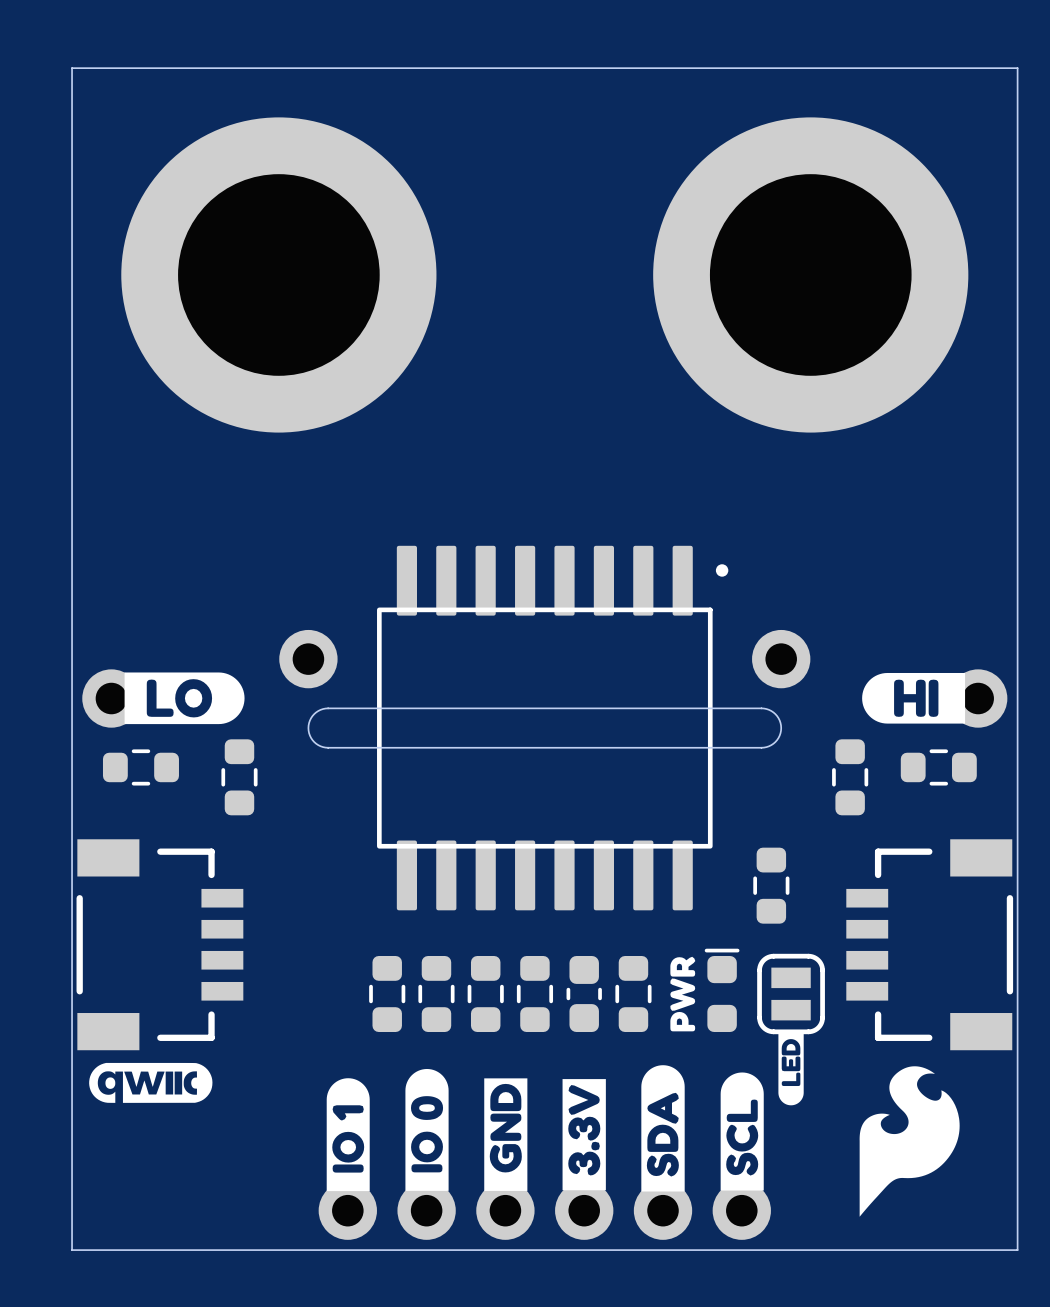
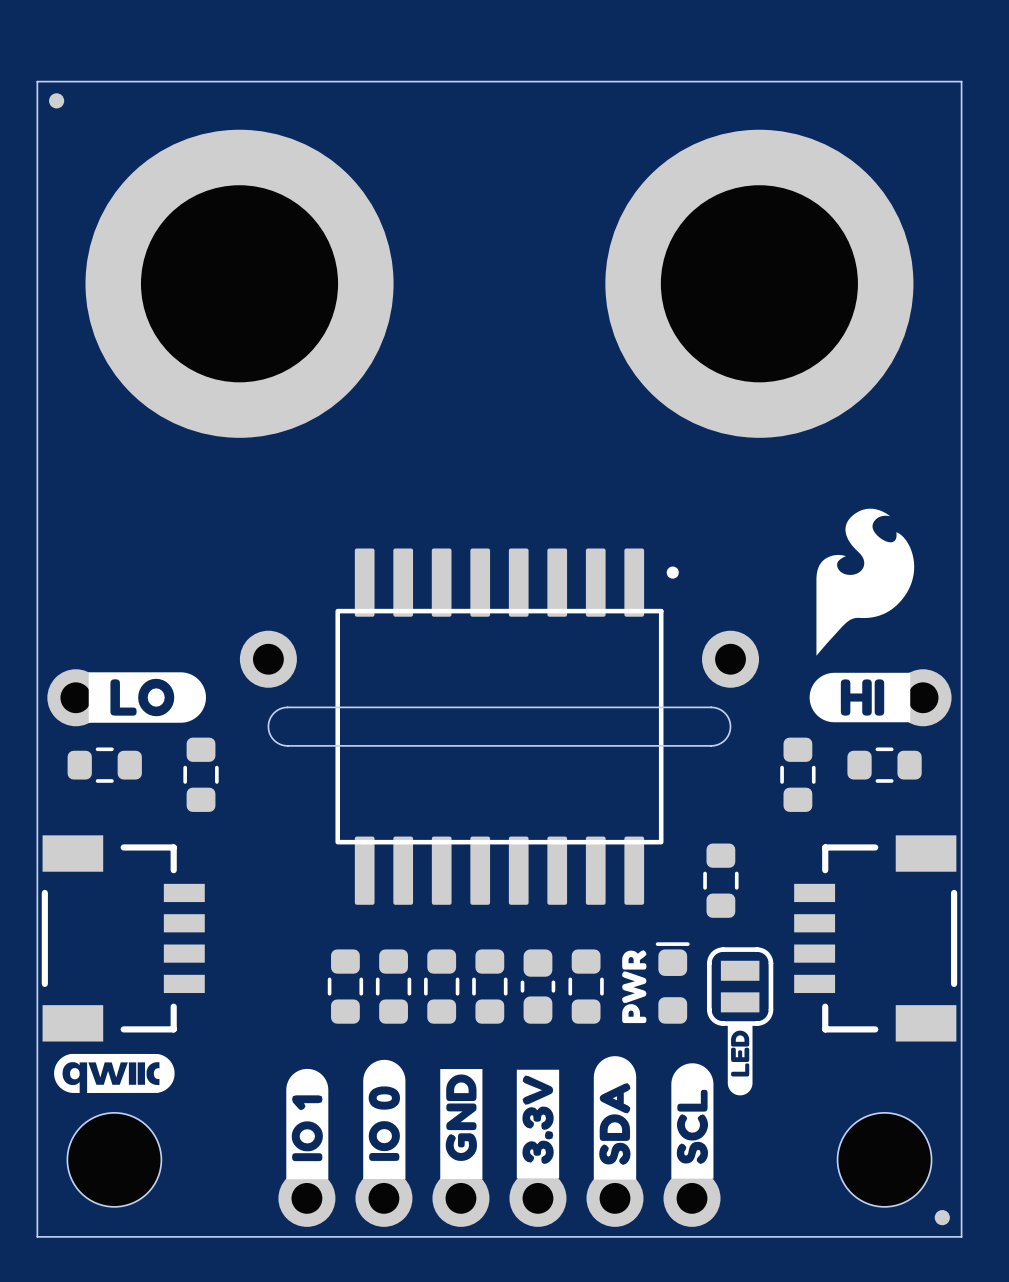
part: none -> (56, 100)
drawing position: (909, 1141) -> (865, 582)
part: none -> (114, 1159)
part: none -> (884, 1159)
part: none -> (942, 1217)

